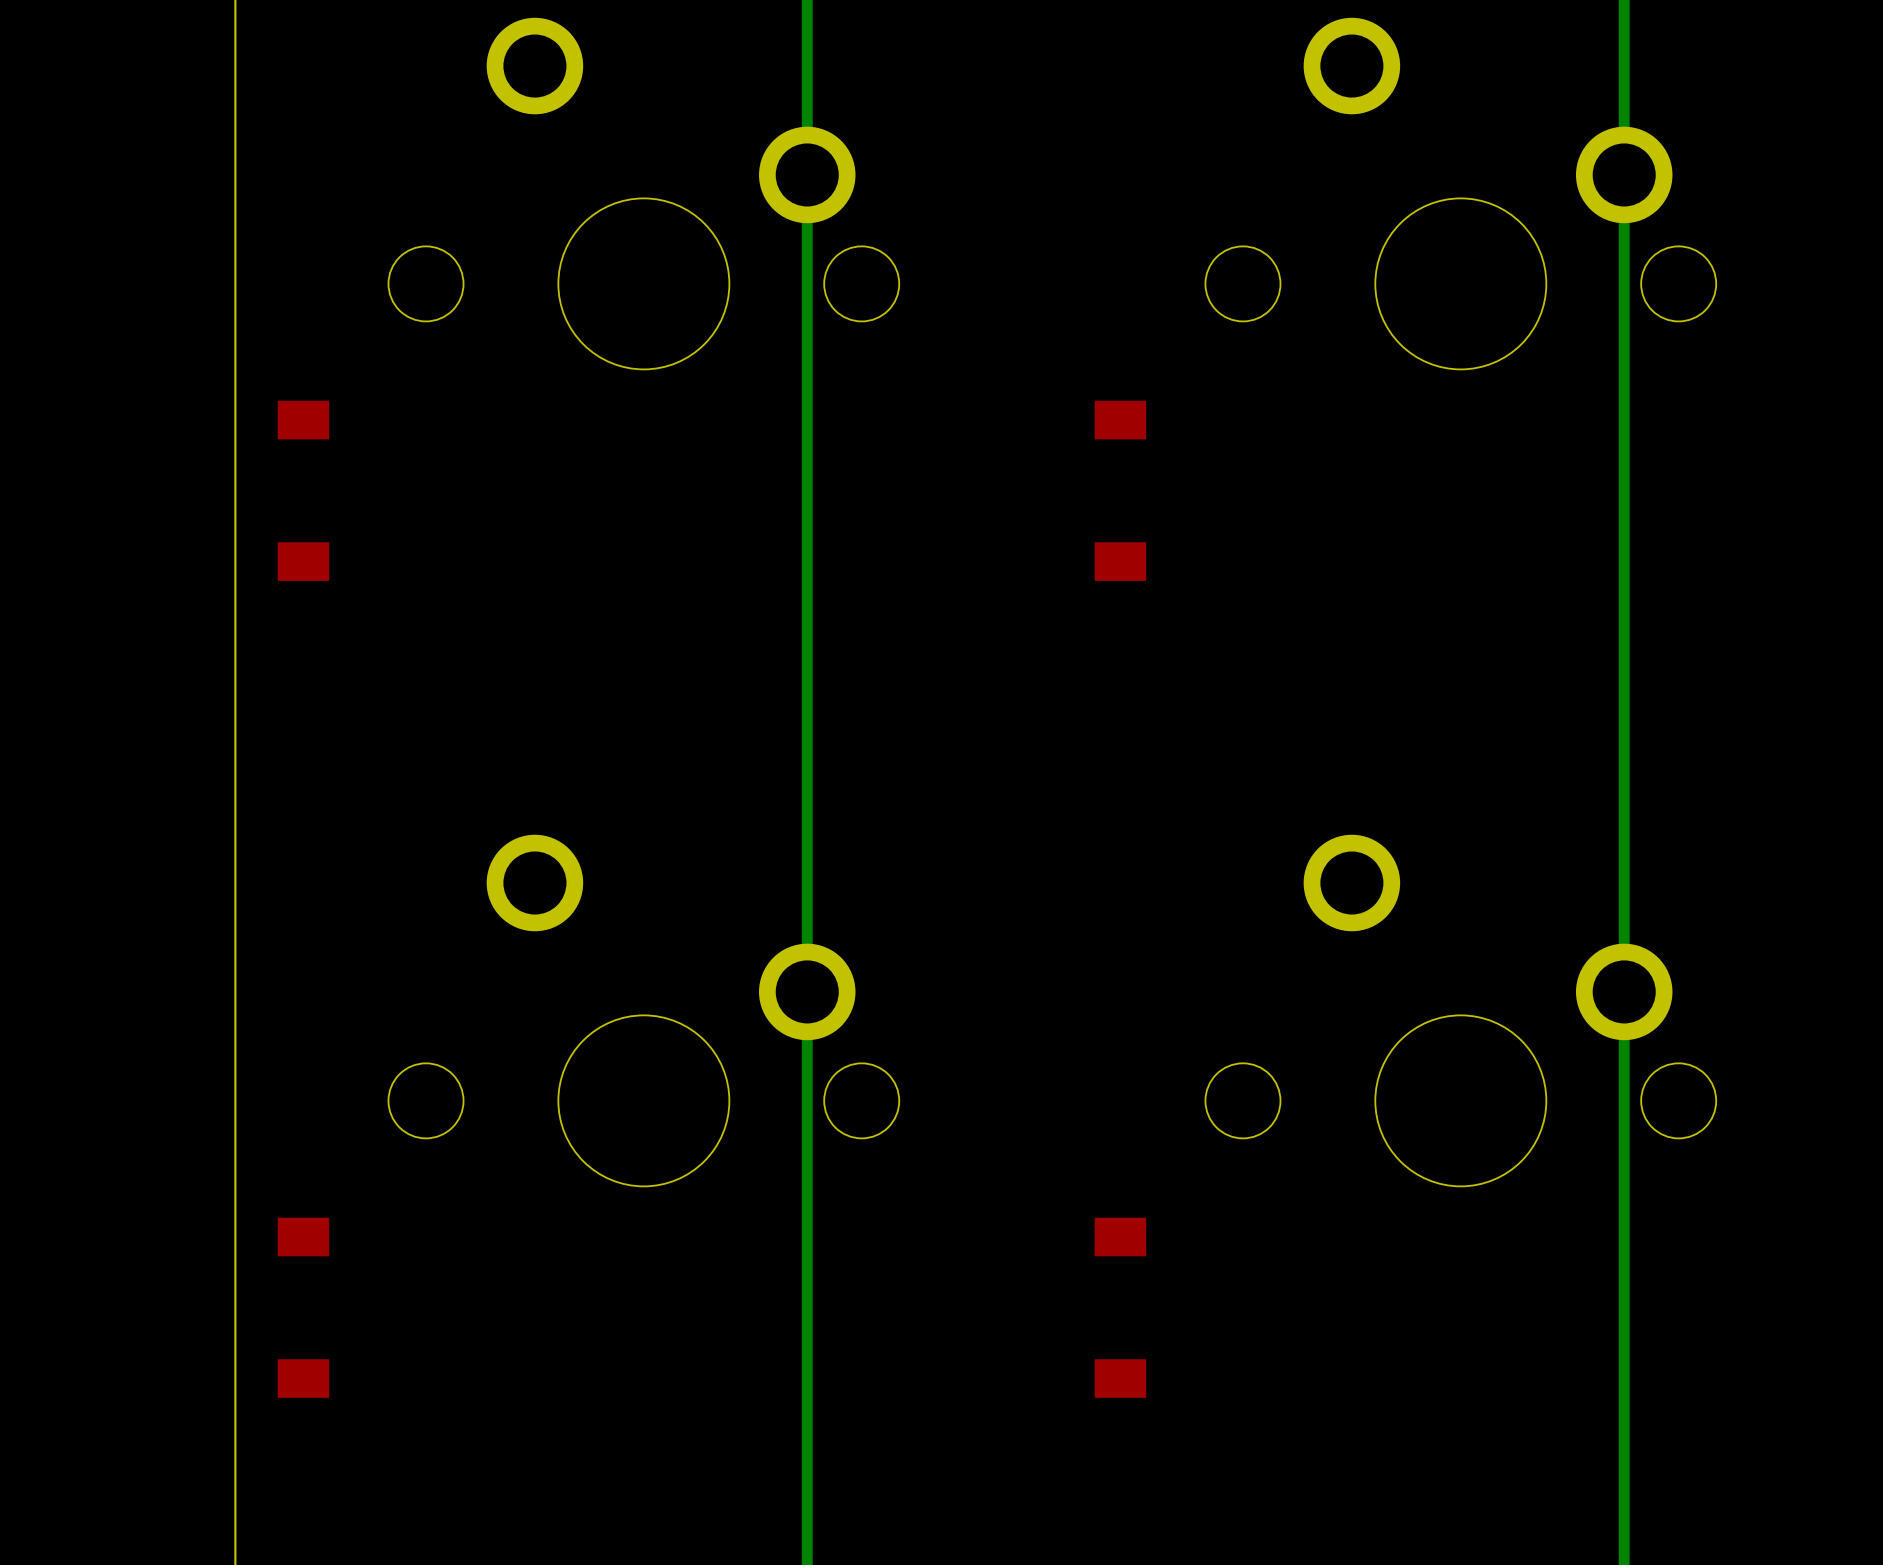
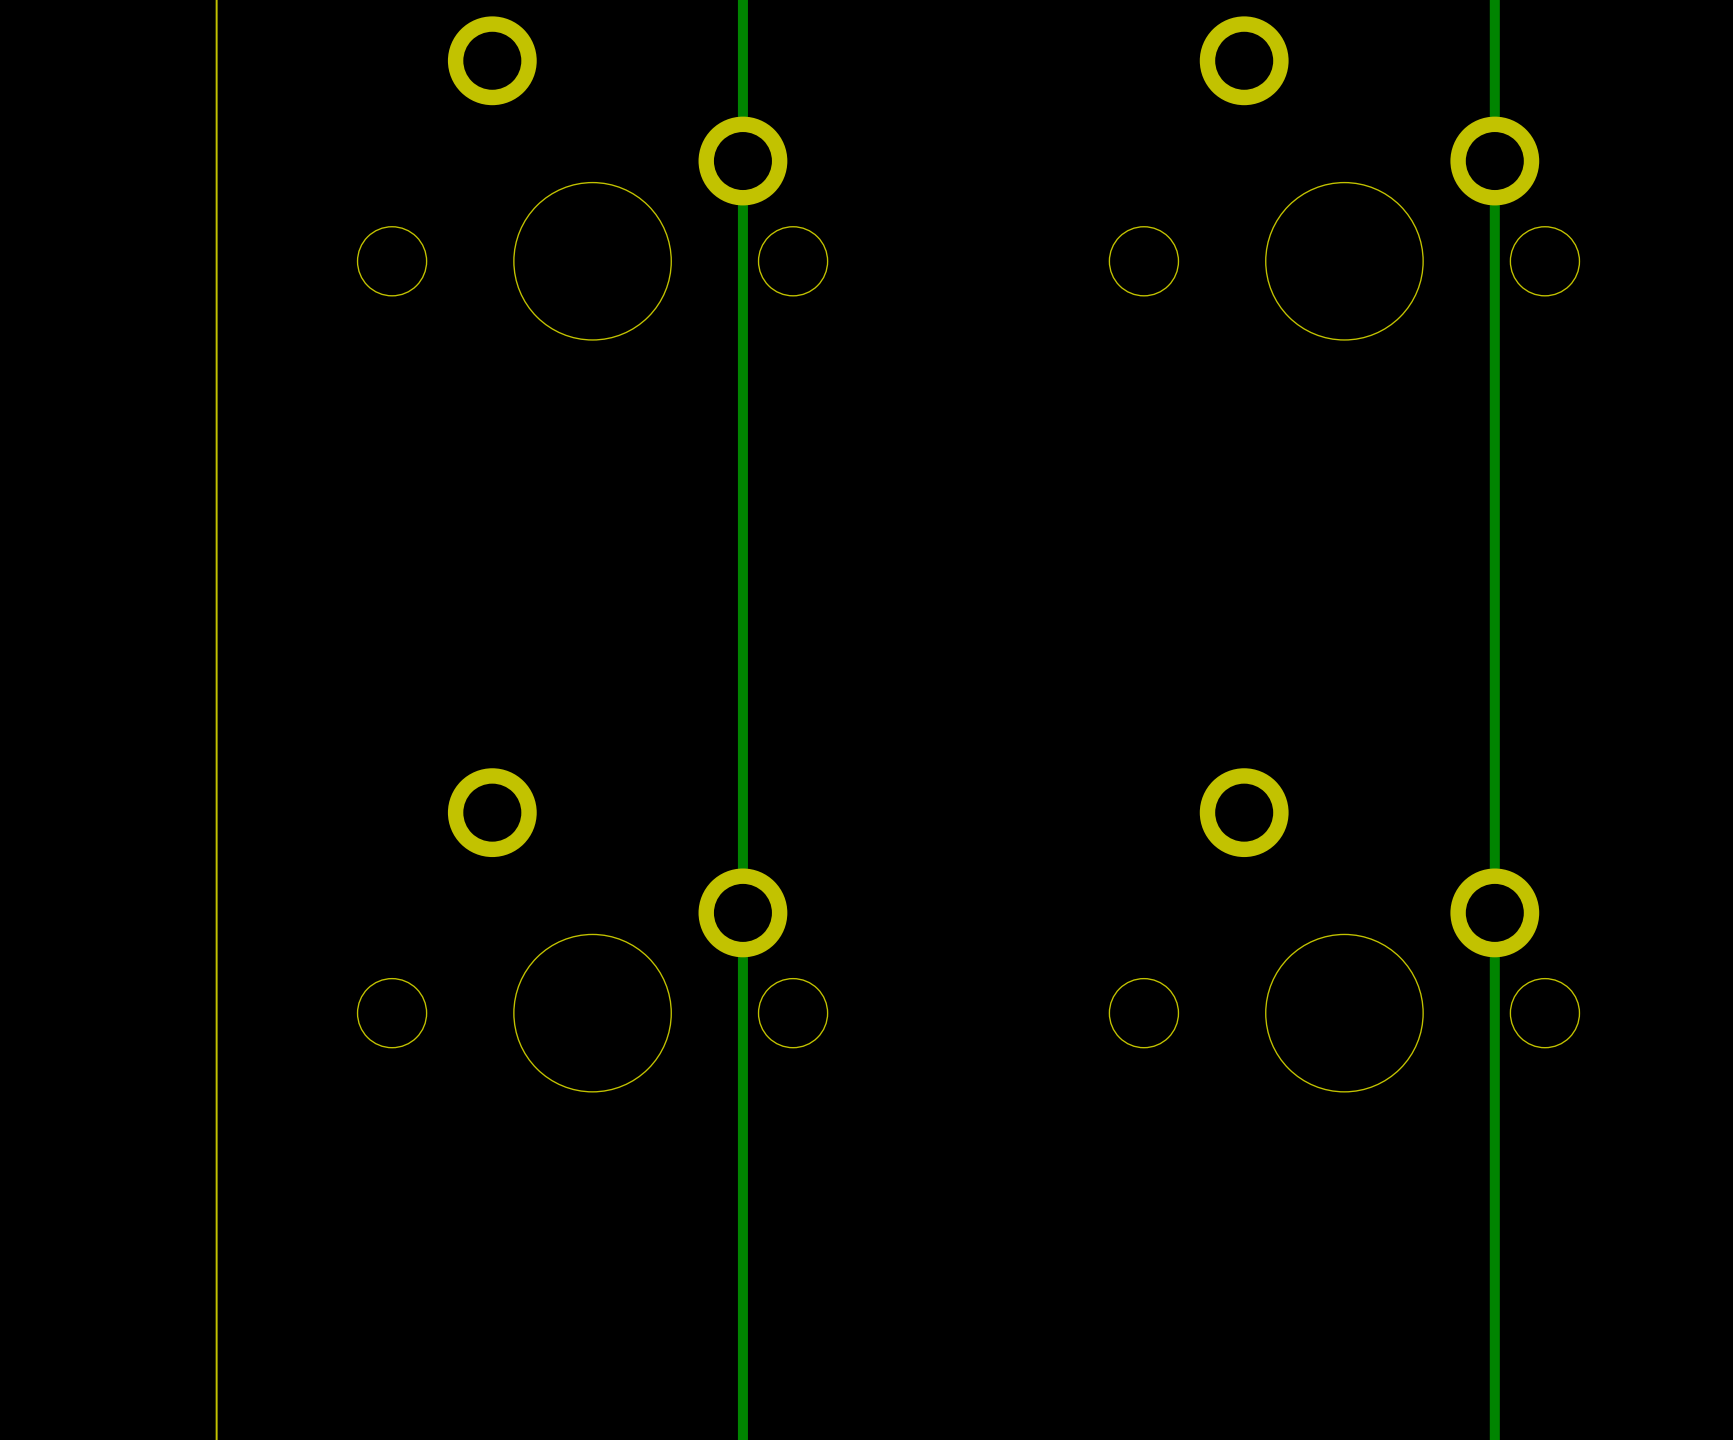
part: (303, 490) -> none
part: (1120, 490) -> none
part: (303, 1307) -> none
part: (1120, 1307) -> none

